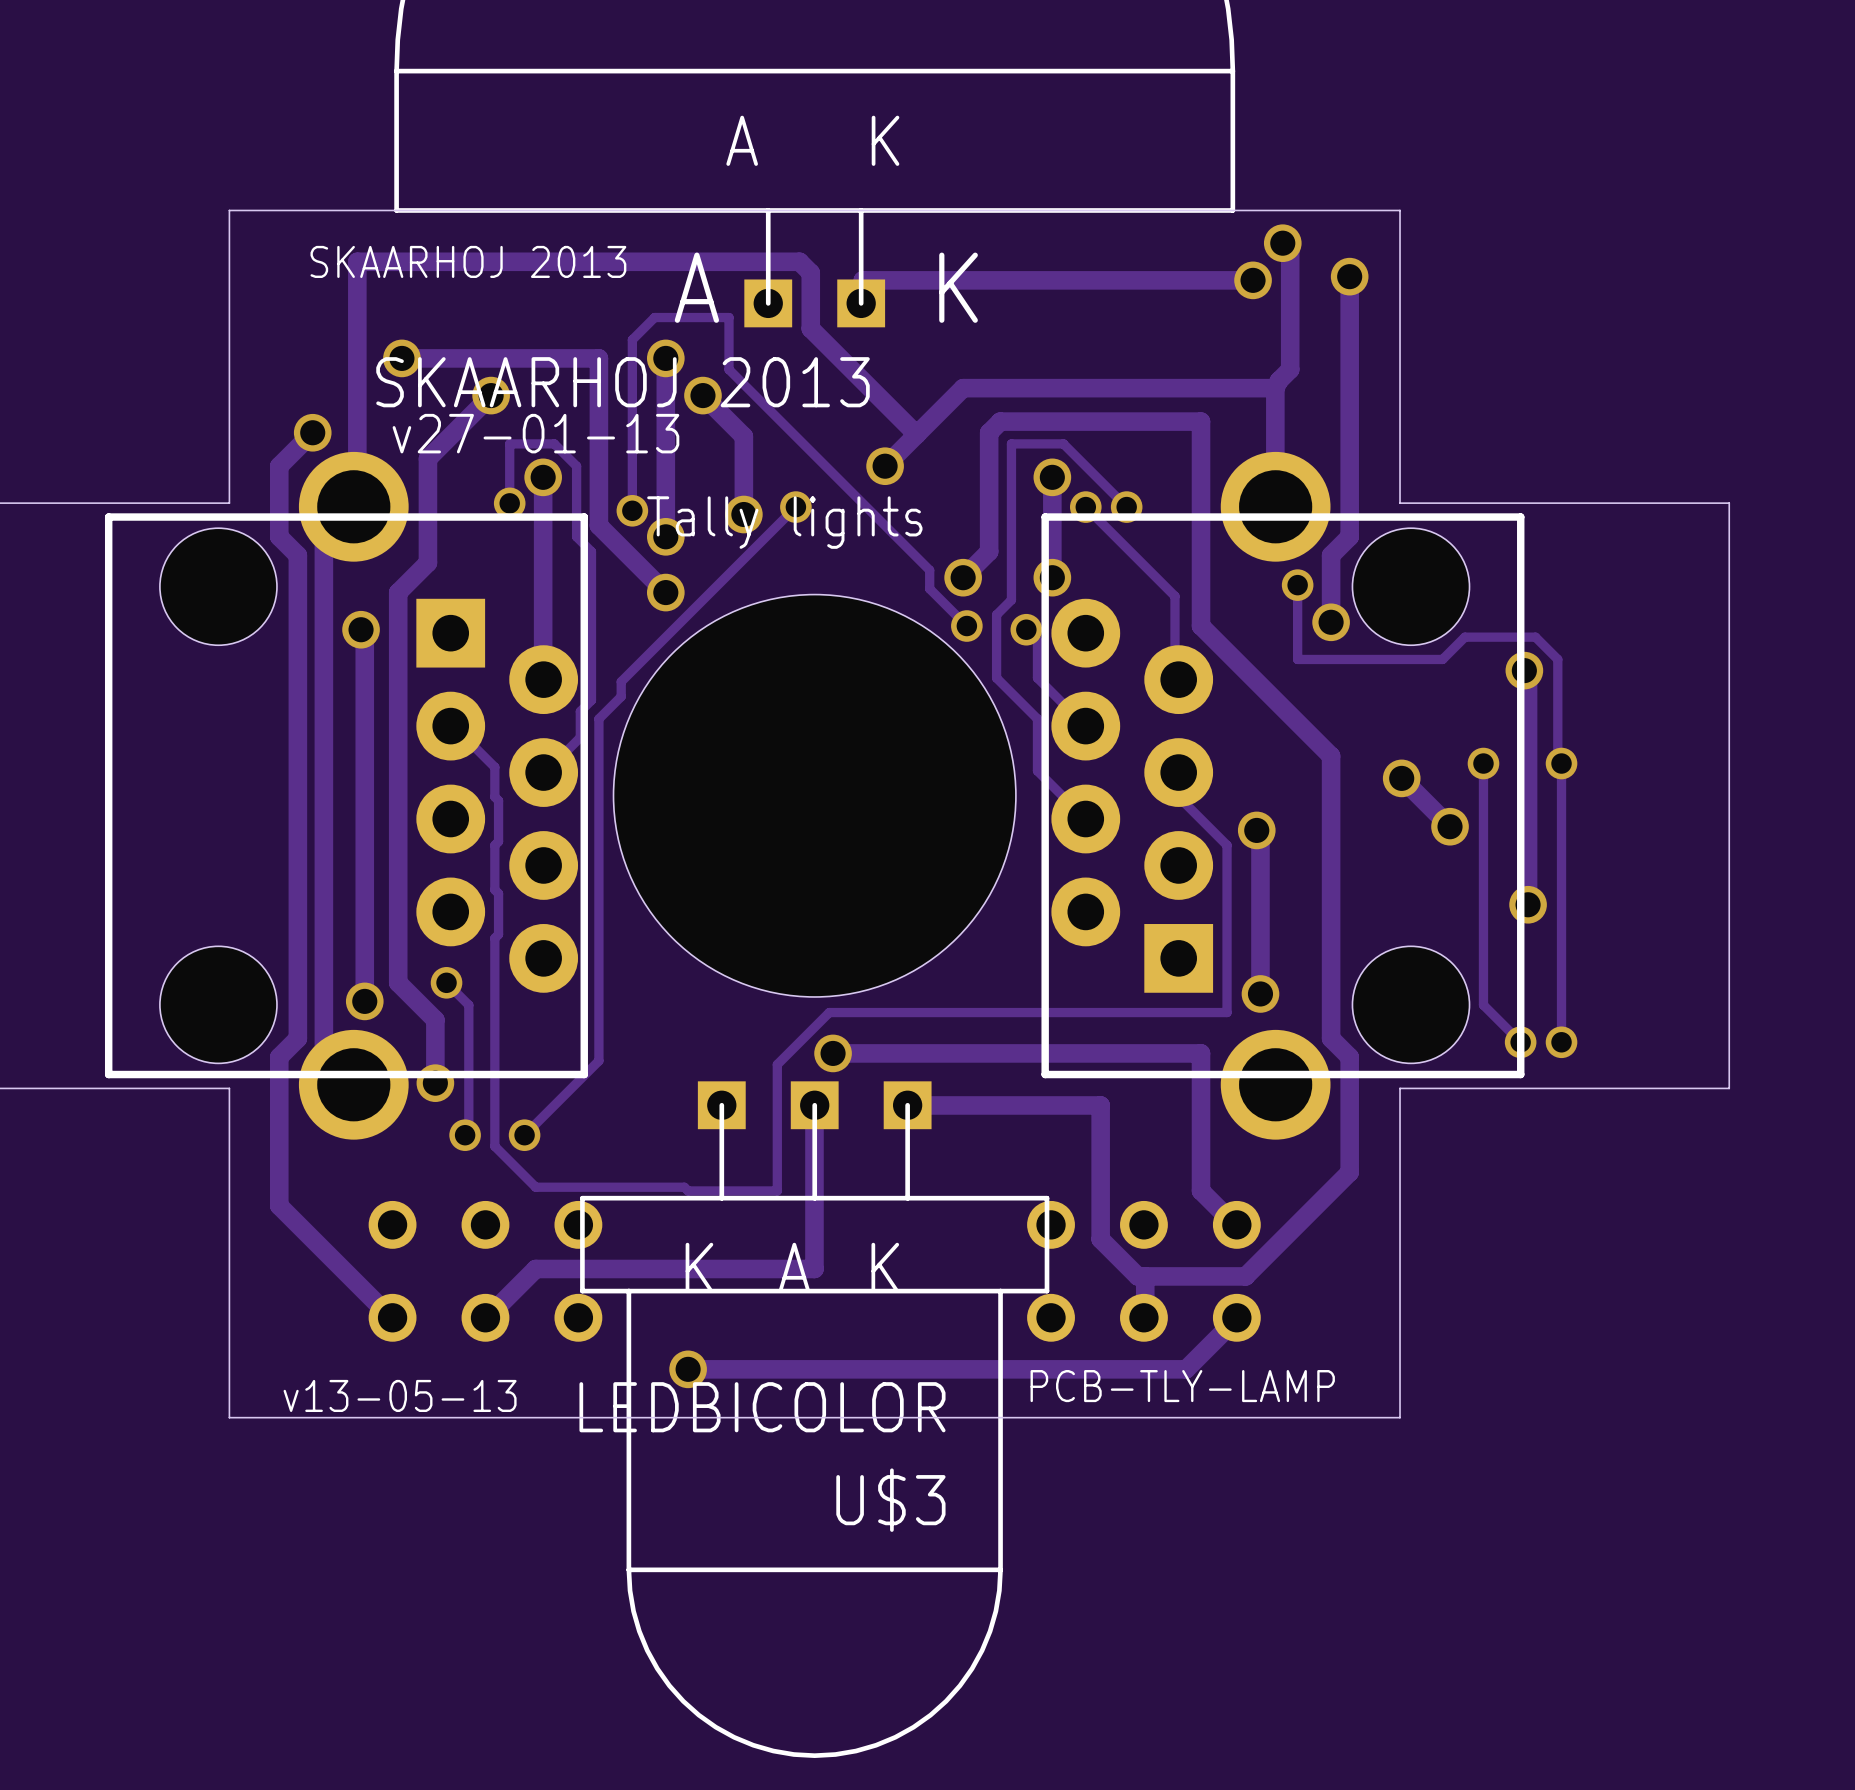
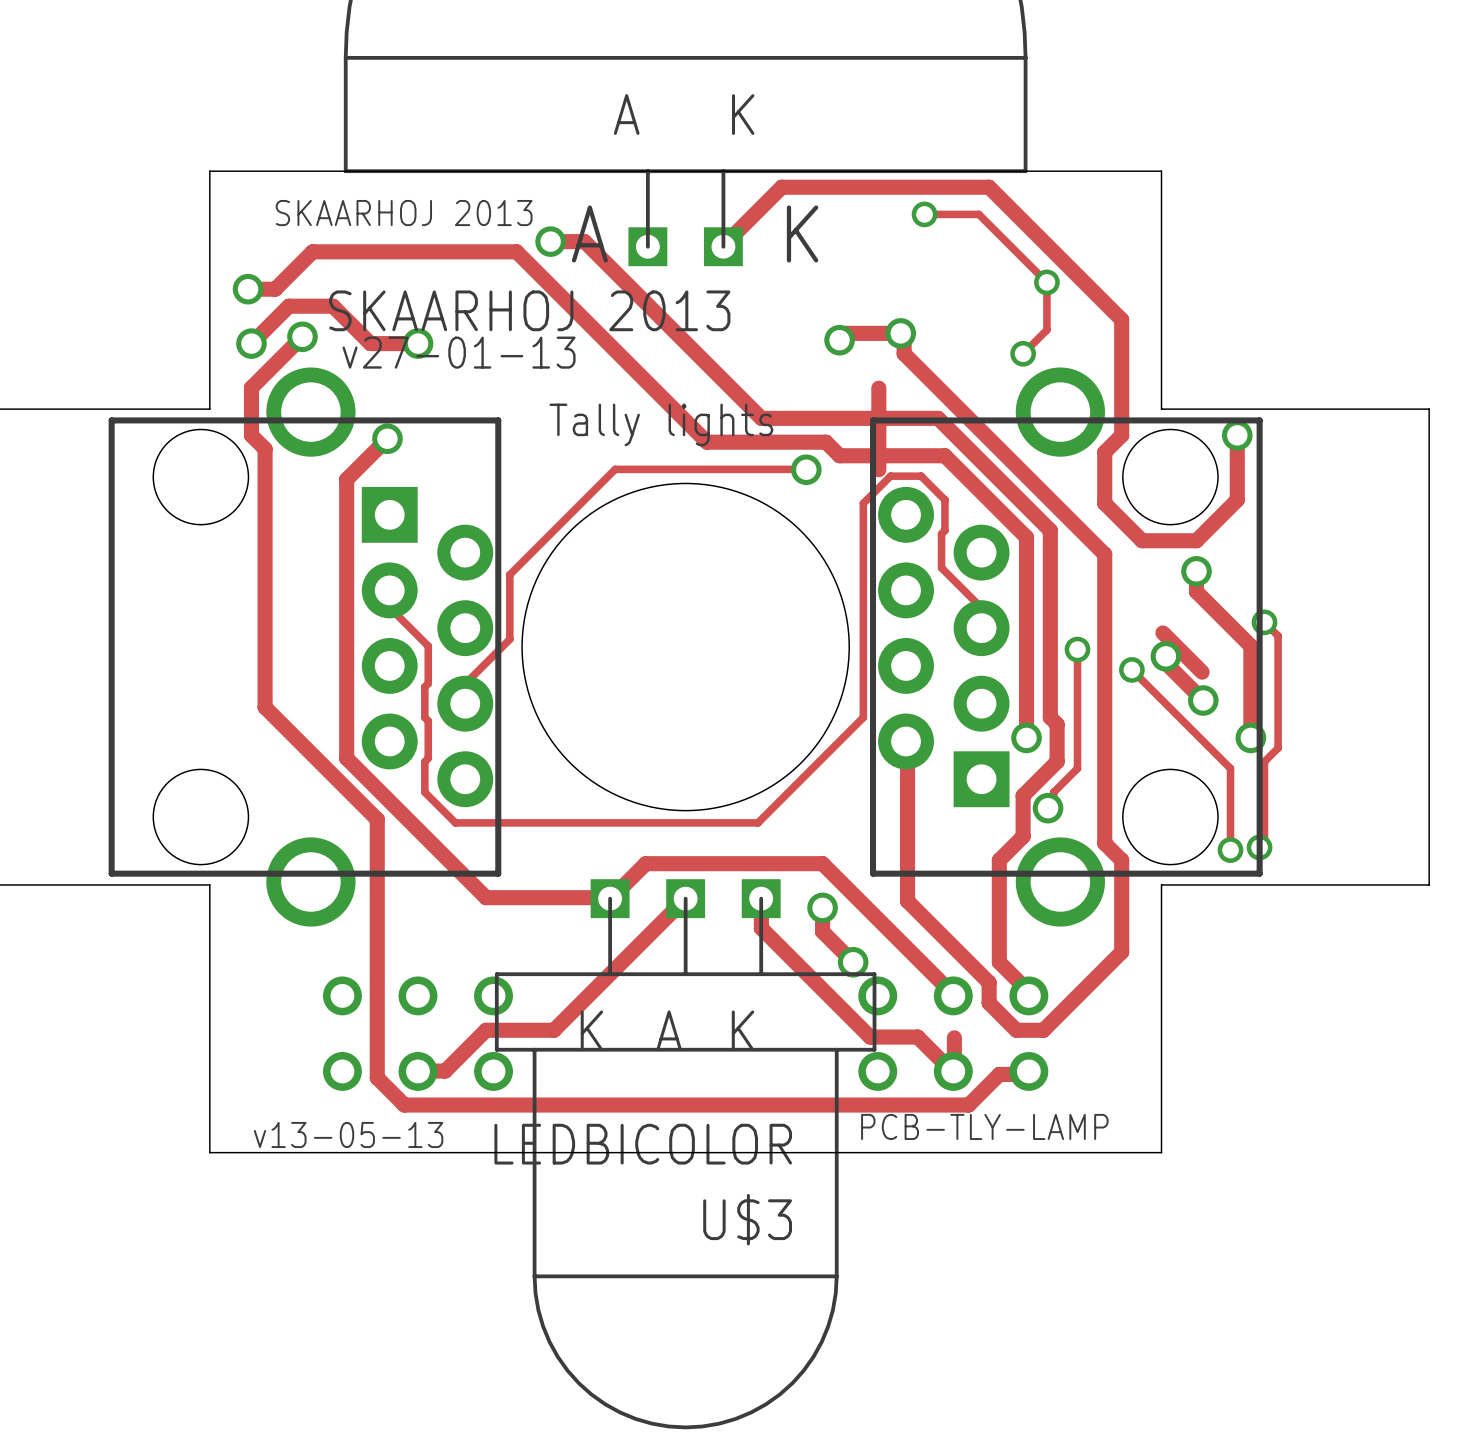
track: (1282, 243) (1290, 250) (1290, 369) (1279, 380) (1275, 388) -> none
via: (1282, 243) -> none
track: none -> (924, 214) (978, 214) (1046, 282) (1046, 329) (1023, 353)
via: none -> (924, 214)
track: (1349, 276) (1349, 536) -> none
via: (1349, 276) -> none
track: (1253, 280) (862, 280) (862, 302) (861, 303) -> (1120, 436) (1121, 319) (989, 187) (781, 187) (723, 246)
via: (1253, 280) -> none
via: none -> (550, 241)
via: none -> (1046, 282)
track: none -> (248, 289) (275, 289) (312, 251) (516, 251) (706, 442) (825, 442) (839, 455) (944, 455) (1026, 537) (1026, 737)
via: none -> (248, 289)
track: (401, 358) (598, 358) (598, 525) (665, 592) -> none
via: (401, 358) -> none
track: (665, 358) (665, 536) -> none
via: (665, 358) -> none
track: (1275, 388) (963, 388) (885, 466) -> none
track: (1275, 388) (1275, 506) -> none
track: (491, 395) (427, 458) (427, 562) (398, 592) (398, 982) (435, 1019) -> (302, 336) (251, 387) (251, 435) (265, 448) (265, 707) (377, 819) (377, 829)
via position: (491, 395) -> (418, 343)
track: (702, 395) (743, 436) (743, 514) -> none
via: (702, 395) -> none
via: none -> (900, 333)
via: none -> (302, 336)
via: none -> (839, 340)
track: none -> (251, 343) (288, 306) (333, 306) (370, 343) (418, 343)
via: none -> (251, 343)
track: (312, 432) (279, 466) (279, 536) (297, 555) (297, 1038) (279, 1057) (279, 1205) (392, 1317) -> none
via: (312, 432) -> none
track: (916, 434) (810, 328) (810, 272) (799, 261) (357, 261) (357, 499) (353, 506) -> none
via: none -> (1023, 353)
via: (885, 466) -> none
track: (543, 477) (543, 679) -> none
via: (543, 477) -> none
via: (1052, 477) -> none
track: (509, 503) (509, 443) (554, 443) (576, 466) (576, 536) (591, 551) (591, 700) (580, 711) (580, 737) (543, 772) -> none
via: (509, 503) -> none
track: (353, 507) (323, 536) (323, 1053) (353, 1084) -> none
track: (795, 507) (621, 681) (621, 696) (598, 718) (598, 1060) (524, 1135) -> none
via: (795, 507) -> none
track: (1085, 507) (1174, 596) (1174, 678) (1178, 679) -> none
via: (1085, 507) -> none
track: (1126, 507) (1063, 443) (1011, 443) (1011, 600) (996, 614) (996, 678) (1037, 718) (1037, 770) (1085, 819) -> none
via: (1126, 507) -> none
track: (632, 510) (632, 339) (654, 317) (728, 317) (728, 369) (929, 570) (929, 588) (966, 626) -> none
via: (632, 510) -> none
via: (743, 514) -> none
via: none -> (1237, 435)
via: (665, 536) -> none
track: none -> (387, 438) (346, 479) (346, 758) (486, 897) (610, 898) (645, 863) (822, 863) (953, 995)
via: none -> (387, 438)
track: (1331, 555) (1331, 622) -> (1105, 451) (1104, 503) (1142, 540) (1196, 540) (1237, 499) (1237, 435)
track: none -> (805, 469) (615, 469) (509, 574) (509, 639) (465, 683) (465, 703)
track: (963, 577) (989, 551) (989, 432) (1000, 421) (1201, 421) (1201, 626) (1331, 756) (1331, 1038) (1349, 1057) (1349, 1172) -> (839, 340) (846, 333) (900, 333) (904, 340) (904, 353) (1104, 554) (1104, 843) (1121, 860) (1120, 953)
via: (1052, 577) -> none
track: (1297, 585) (1297, 659) (1442, 659) (1464, 637) (1535, 637) (1557, 659) (1557, 756) (1561, 759) (1561, 1042) -> none
via: (1297, 585) -> none
via: (665, 592) -> none
via: (1331, 622) -> none
via: (966, 626) -> none
track: (361, 629) (364, 633) (364, 1001) -> none
via: (361, 629) -> none
track: (1026, 629) (1037, 640) (1037, 678) (1085, 726) -> none
via: (1026, 629) -> none
track: (1524, 670) (1528, 674) (1528, 904) -> none
via: (1524, 670) -> none
track: none -> (1196, 571) (1196, 591) (1250, 646) (1250, 737)
via: none -> (1196, 571)
track: (450, 726) (453, 726) (494, 767) (494, 796) (498, 800) (498, 841) (494, 845) (494, 889) (498, 893) (498, 934) (494, 938) (494, 1146) (535, 1187) (684, 1187) (688, 1190) (777, 1190) (777, 1064) (829, 1012) (1227, 1012) (1227, 845) (1178, 796) (1178, 772) -> (389, 590) (390, 608) (428, 646) (428, 683) (424, 686) (424, 717) (428, 720) (428, 758) (424, 761) (424, 792) (455, 822) (757, 822) (863, 717) (863, 503) (890, 476) (921, 476) (944, 499) (944, 530) (941, 533) (941, 567) (978, 605) (978, 625) (981, 628)
track: (1483, 763) (1483, 1005) (1520, 1042) -> none
via: (1483, 763) -> none
via: (1561, 763) -> none
track: none -> (1264, 622) (1278, 635) (1278, 748) (1264, 761) (1264, 846)
via: none -> (1264, 622)
via position: (1401, 778) -> (1165, 656)
track: none -> (1077, 649) (1077, 768) (1053, 792) (1053, 802)
via: none -> (1077, 649)
track: none -> (1165, 656) (1165, 663) (1203, 700)
track: none -> (1131, 669) (1230, 768) (1230, 850)
via: none -> (1131, 669)
via position: (1450, 826) -> (1203, 700)
track: (1256, 830) (1260, 834) (1260, 993) -> none
via: (1256, 830) -> none
via position: (1528, 904) -> (1250, 737)
via: none -> (1026, 737)
track: none -> (906, 741) (907, 901) (989, 982) (989, 1003) (1016, 1030) (1043, 1030)
track: (446, 982) (468, 1005) (468, 1131) (465, 1135) -> none
via: (446, 982) -> none
via: (364, 1001) -> none
via position: (1561, 1042) -> (1230, 850)
track: (833, 1053) (1201, 1053) (1201, 1190) (1236, 1224) -> (550, 241) (584, 241) (761, 418) (938, 418) (1050, 530) (1050, 717) (1057, 724) (1057, 761) (1023, 795) (1023, 836) (999, 860) (999, 962) (1029, 992) (1028, 995)
via: (833, 1053) -> none
via: (435, 1083) -> none
track: (814, 1105) (814, 1268) (535, 1268) (485, 1317) -> (685, 898) (554, 1030) (486, 1030) (445, 1071) (418, 1071)
track: (907, 1105) (1100, 1105) (1100, 1239) (1137, 1276) (1245, 1276) (1254, 1267) -> (761, 898) (761, 928) (870, 1037) (917, 1037) (953, 1071)
track: none -> (822, 907) (822, 931) (853, 962)
via: none -> (822, 907)
via: (465, 1135) -> none
via: (524, 1135) -> none
via: none -> (853, 962)
track: (1236, 1317) (1186, 1369) (688, 1369) -> (1028, 1071) (1026, 1074) (999, 1074) (968, 1105) (404, 1105) (377, 1077) (377, 880)
via: (688, 1369) -> none

